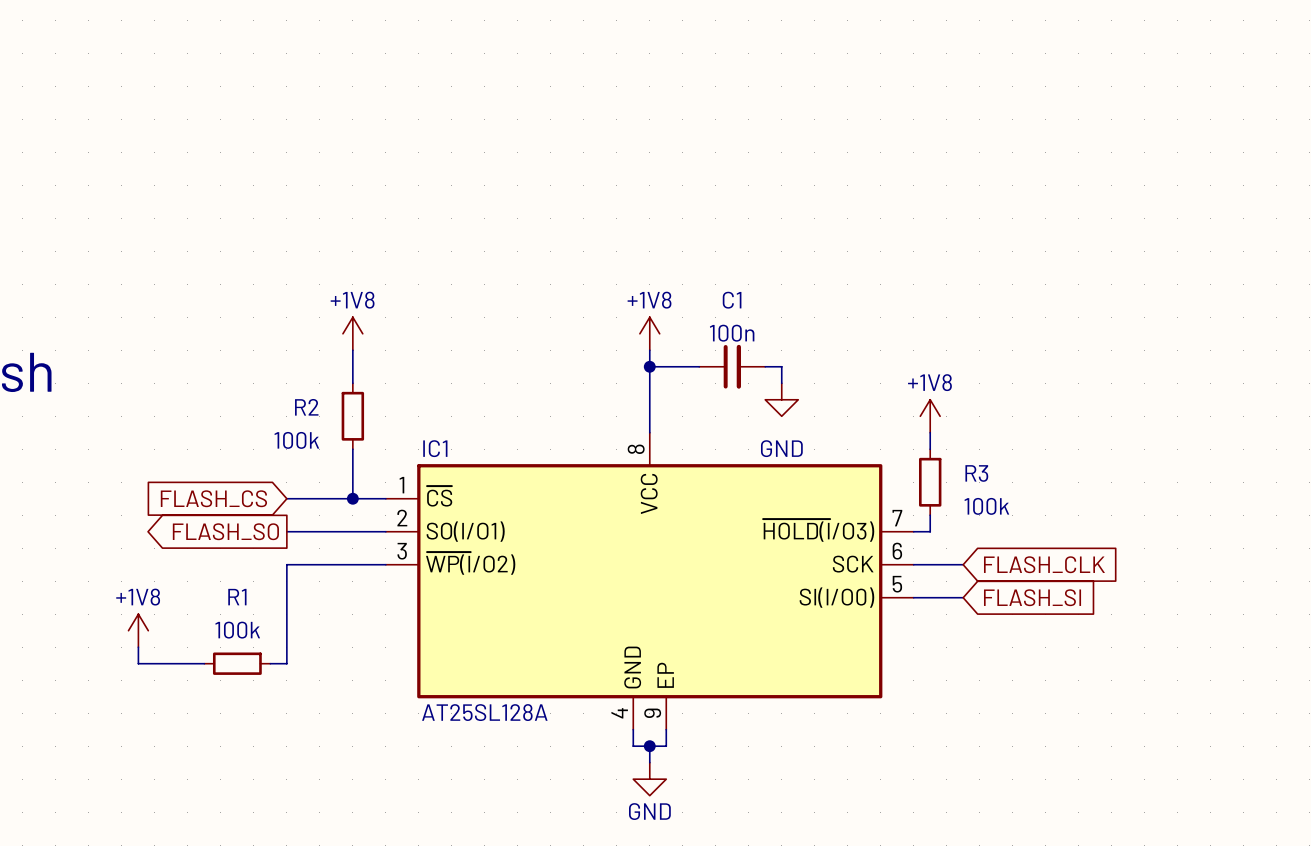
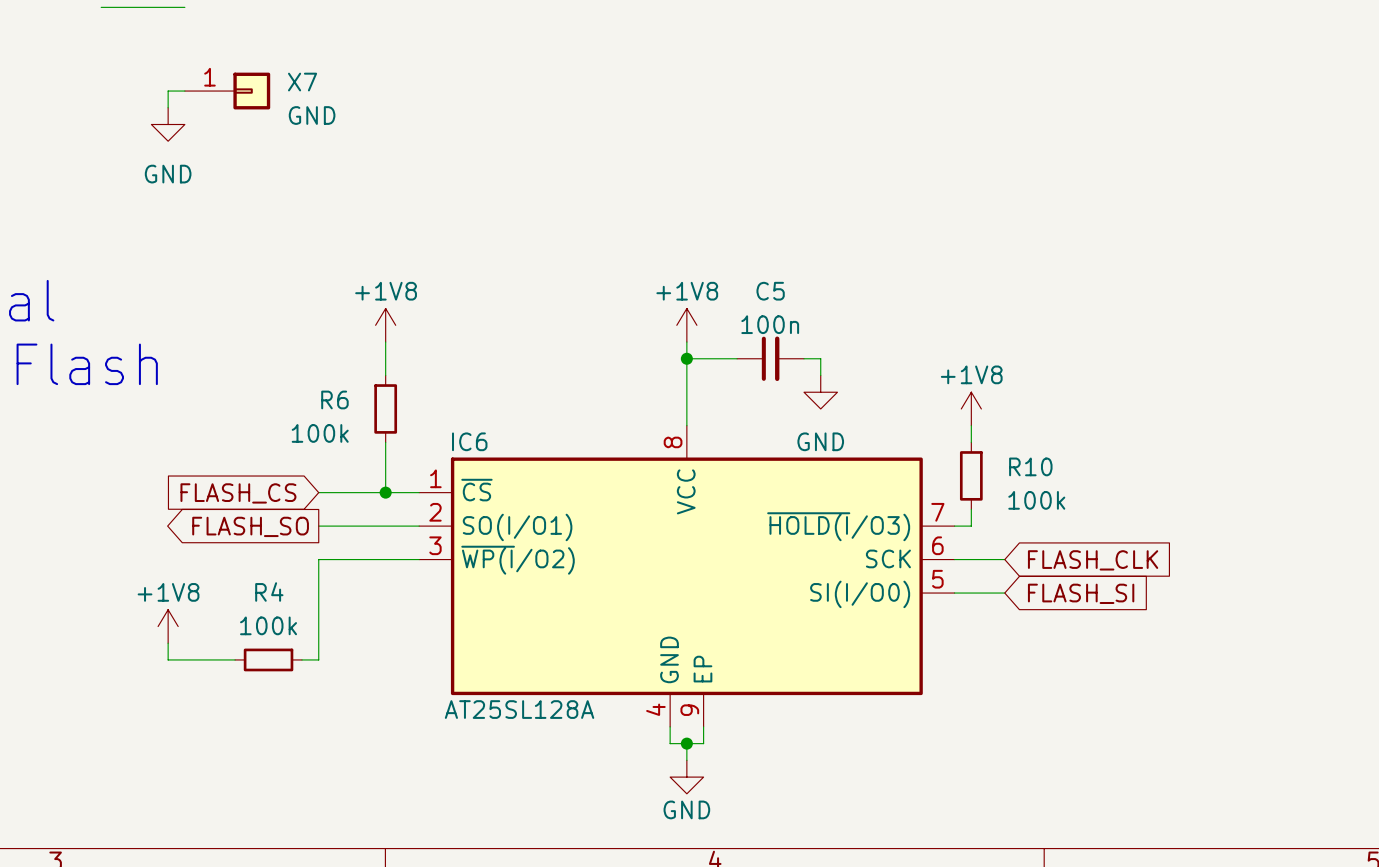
wire: none -> (101, 7) (184, 7)
wire: none -> (184, 91) (168, 91) (168, 107)
X7: none -> GND (227, 91)
power symbol: none -> GND (168, 124)
C1 name: C1 (732, 300) -> C5 (770, 291)
R2 name: R2 (306, 407) -> R6 (334, 399)
IC1 name: IC1 (435, 448) -> IC6 (469, 441)
R3 name: R3 (976, 473) -> R10 (1030, 466)
R1 name: R1 (237, 597) -> R4 (269, 592)

